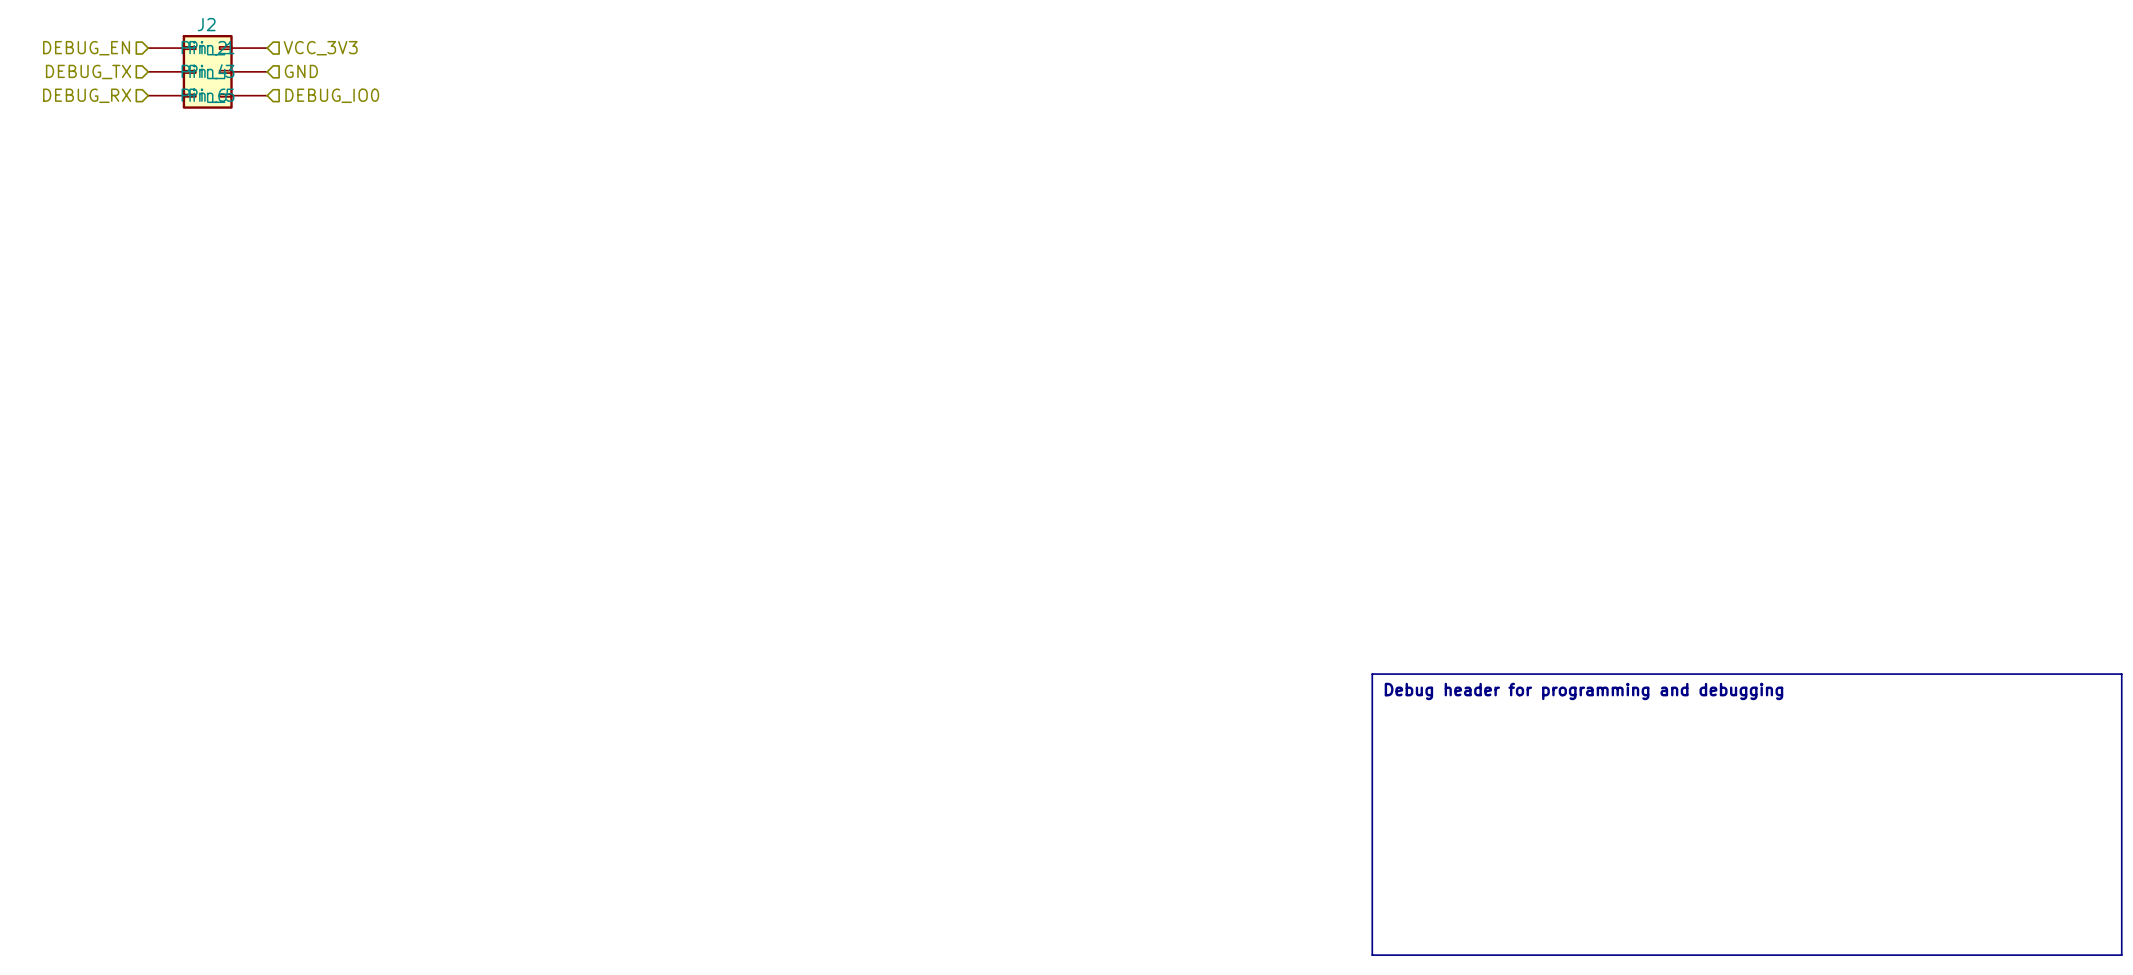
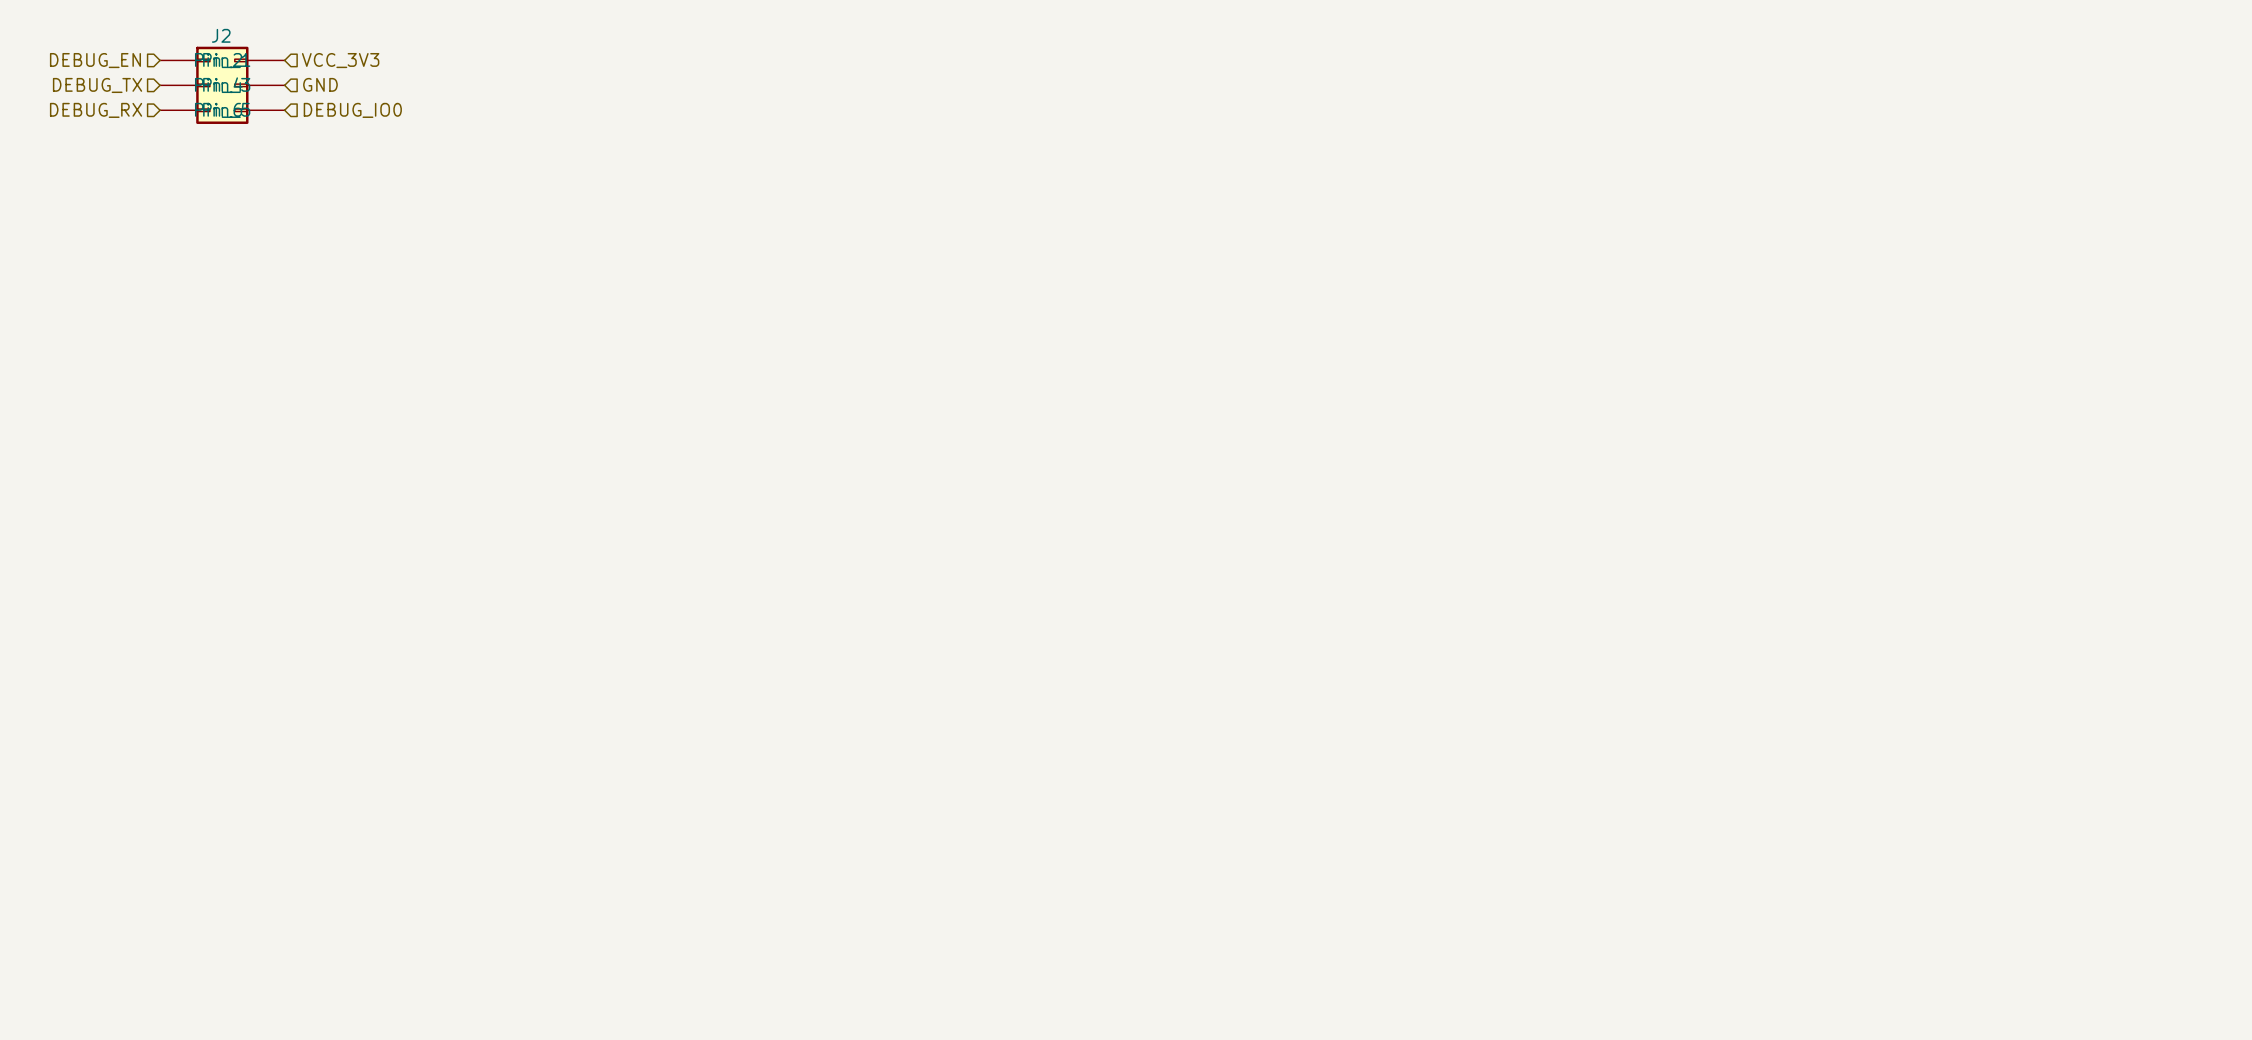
line: (1372, 674) (2121, 674) (2121, 955) (1372, 955) (1372, 674) -> none
text: Debug header for programming and debugging (1583, 691) -> none

